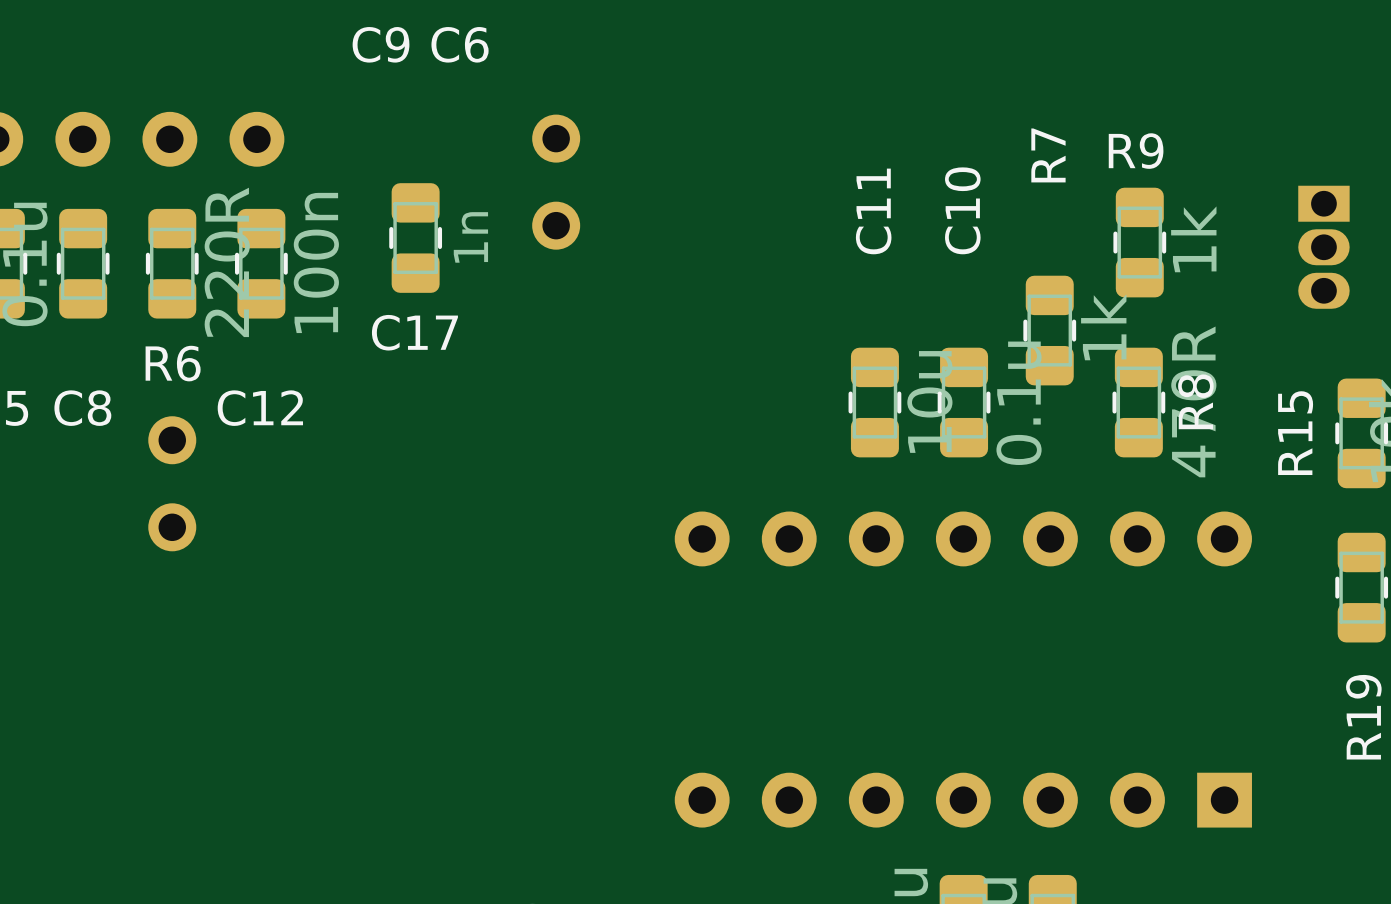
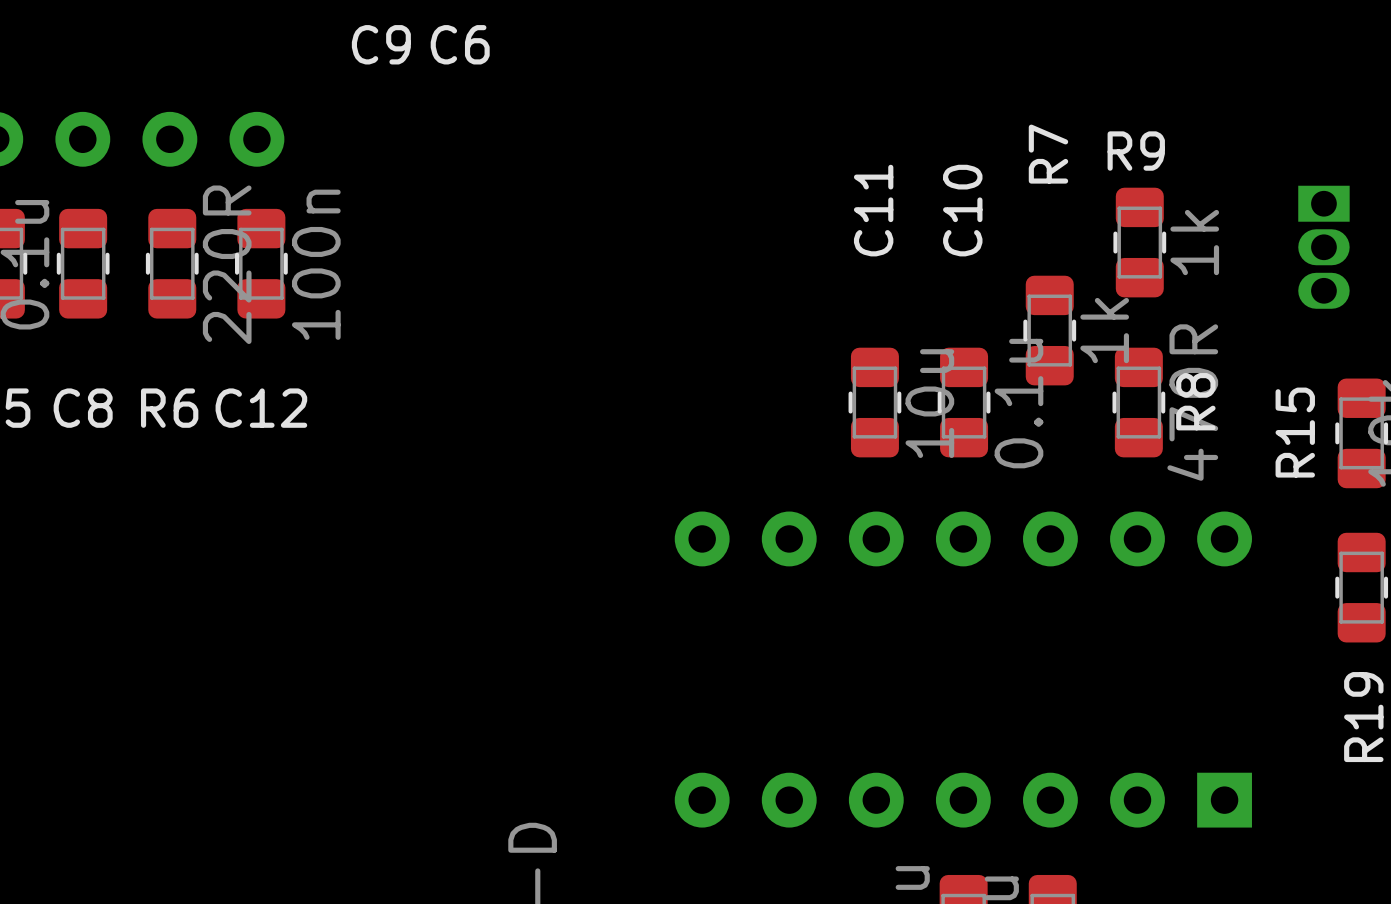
part: (556, 182) -> none
C17: 1n (415, 238) -> none
R6 name position: R6 (173, 363) -> R6 (169, 408)
part: (172, 483) -> none

